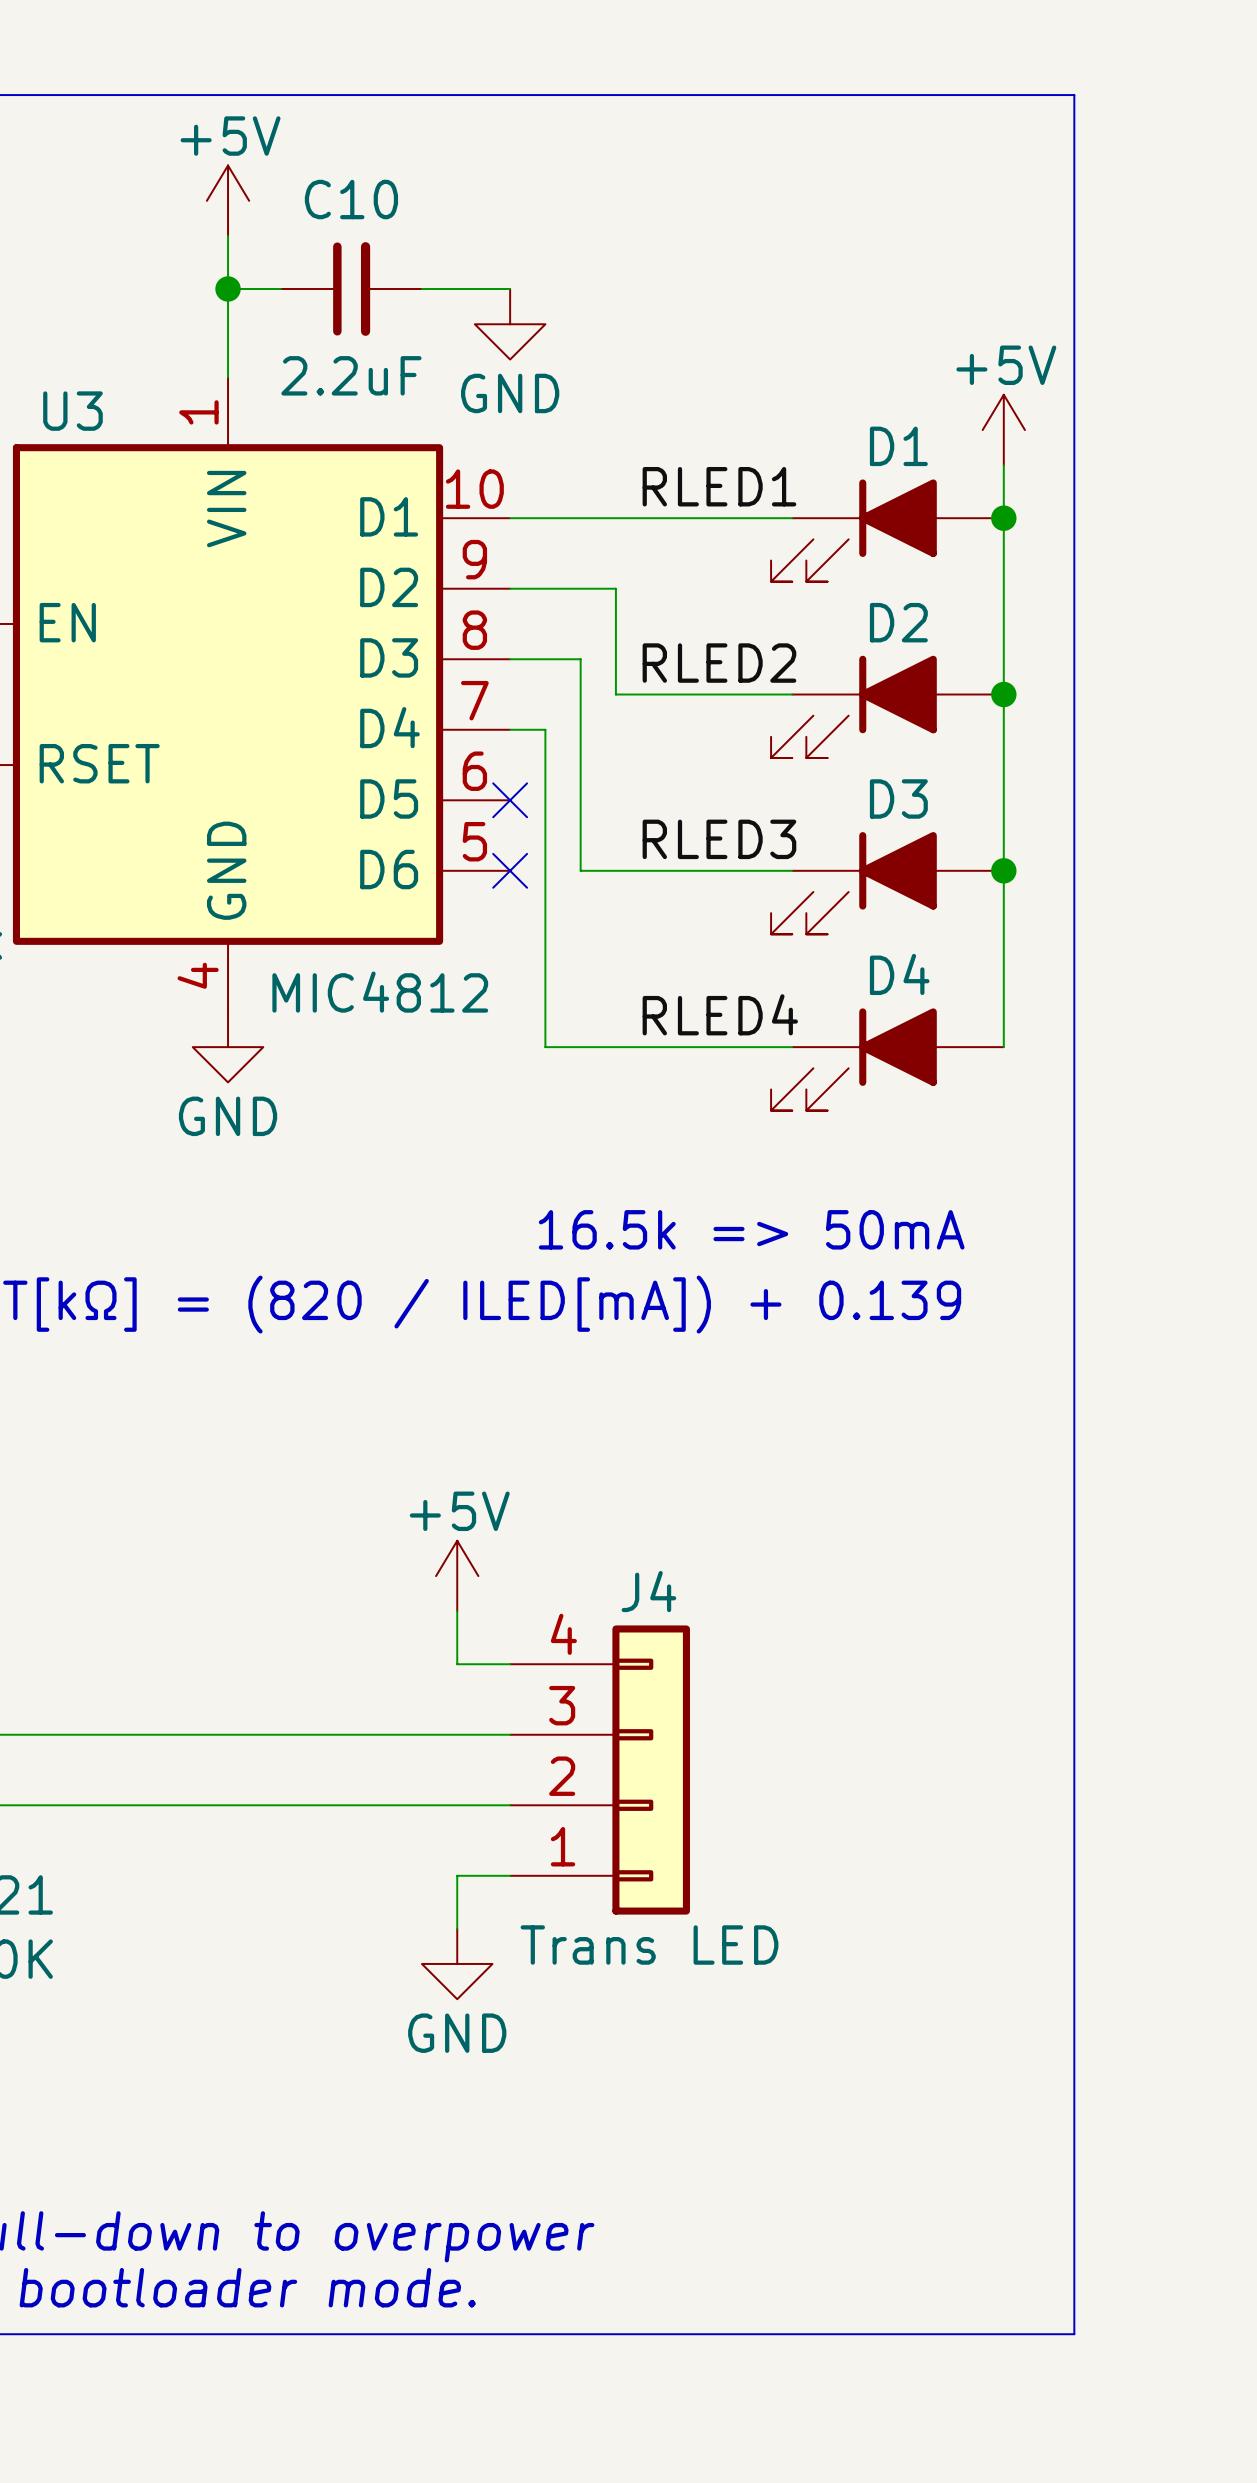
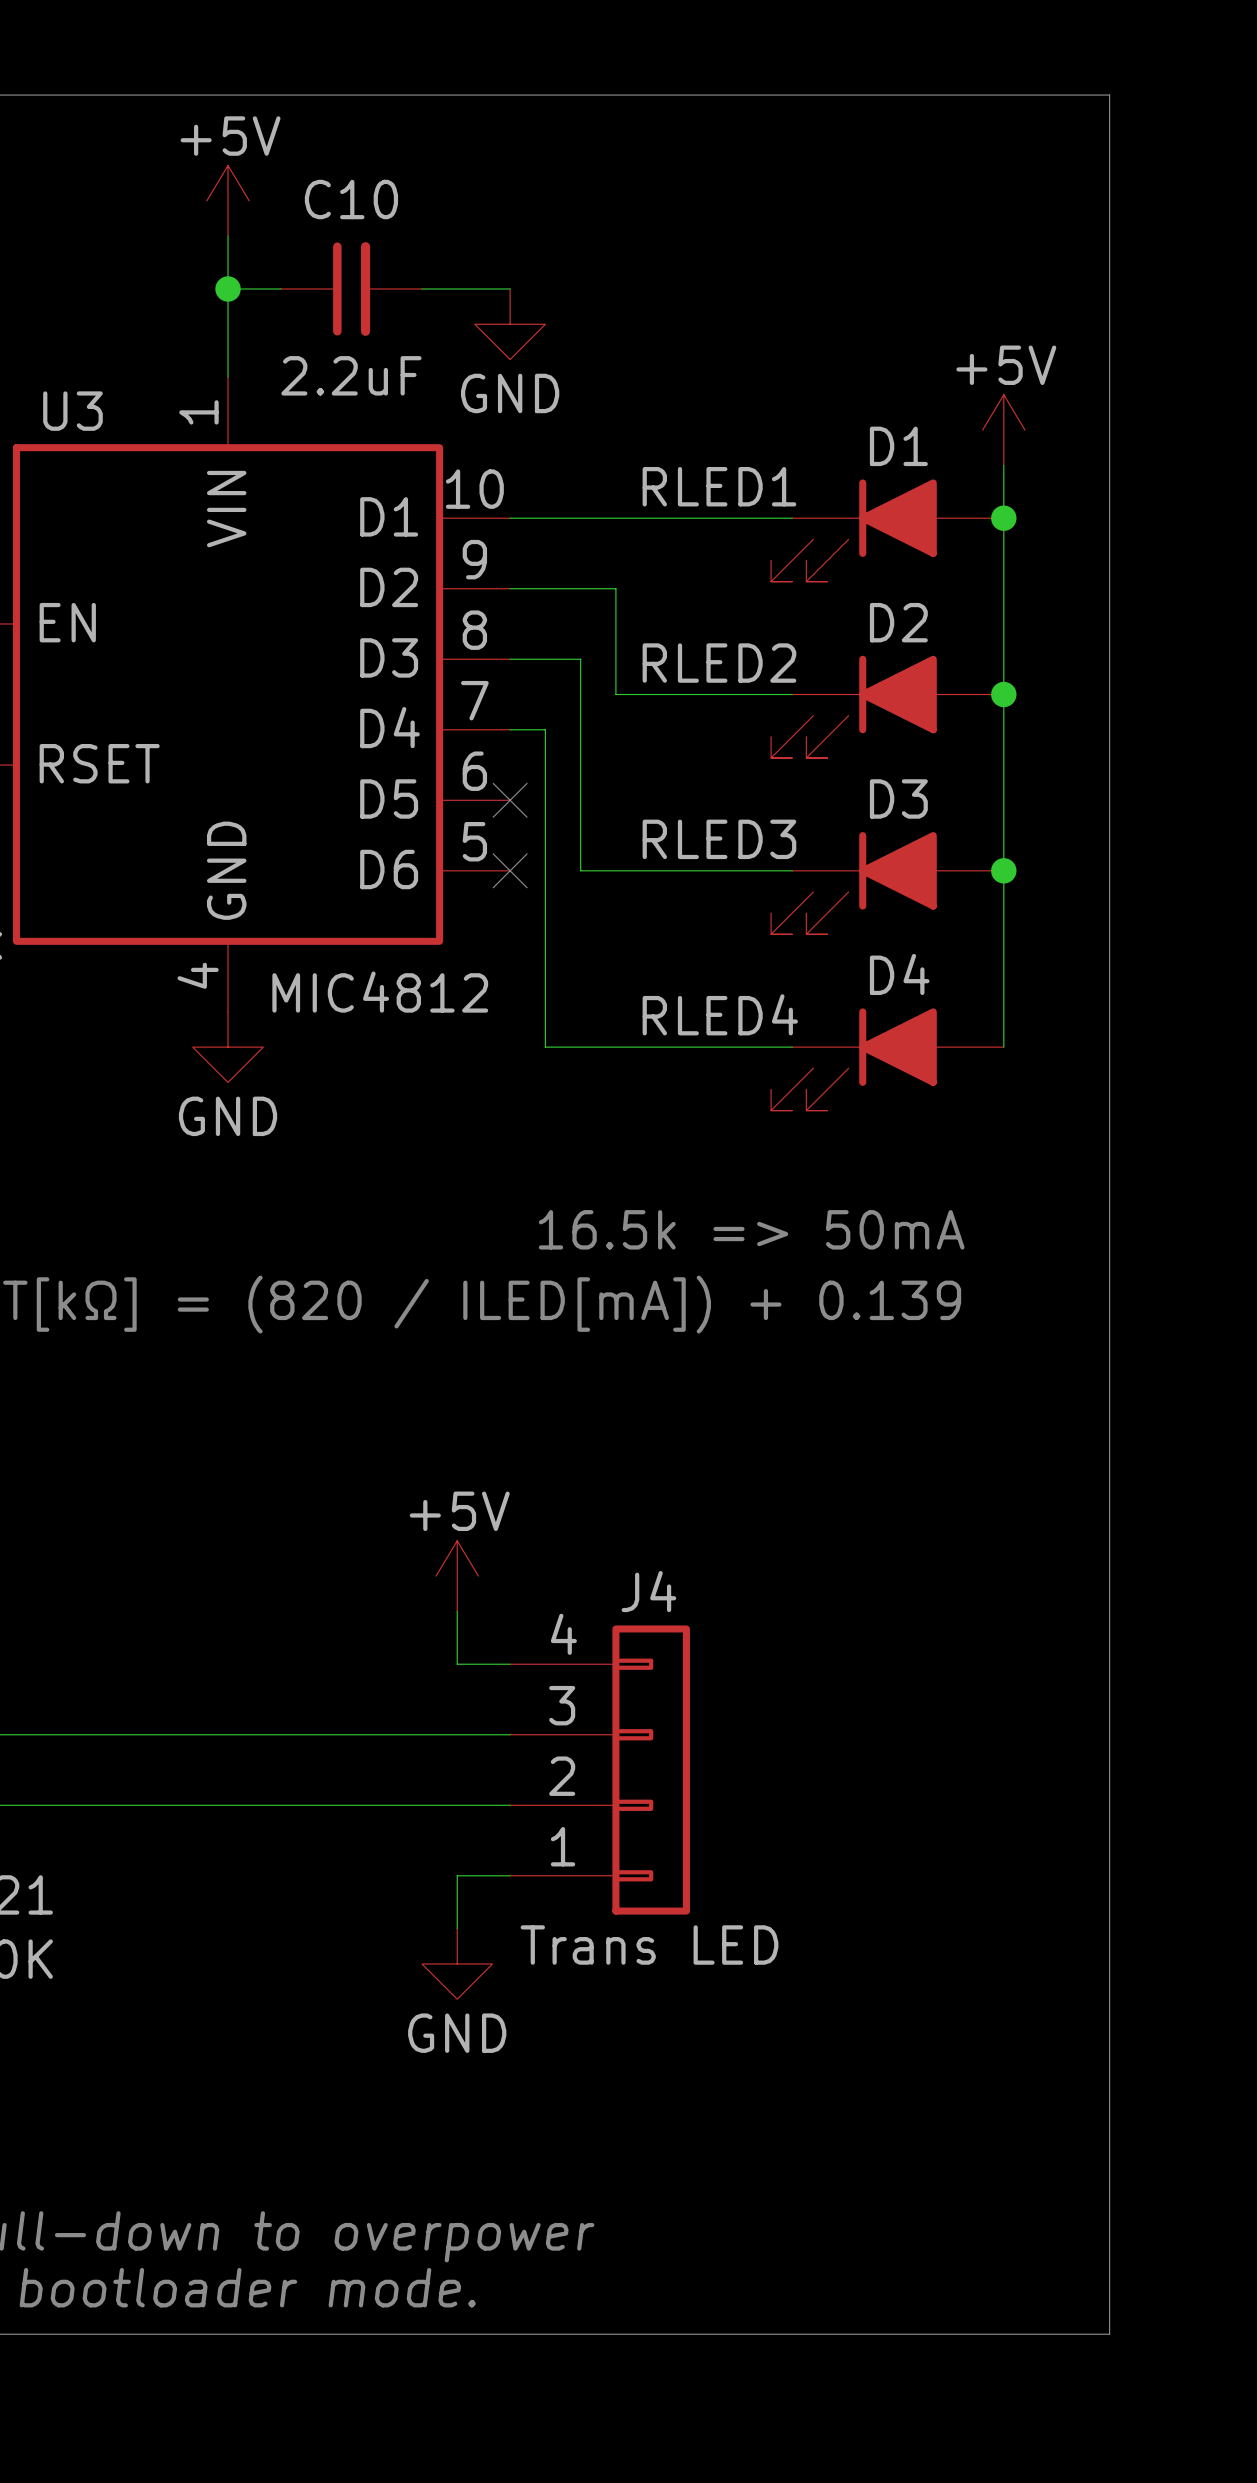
line: (1074, 95) (1074, 2334) -> (1074, 95) (1109, 95) (1109, 2334) (1074, 2334)

